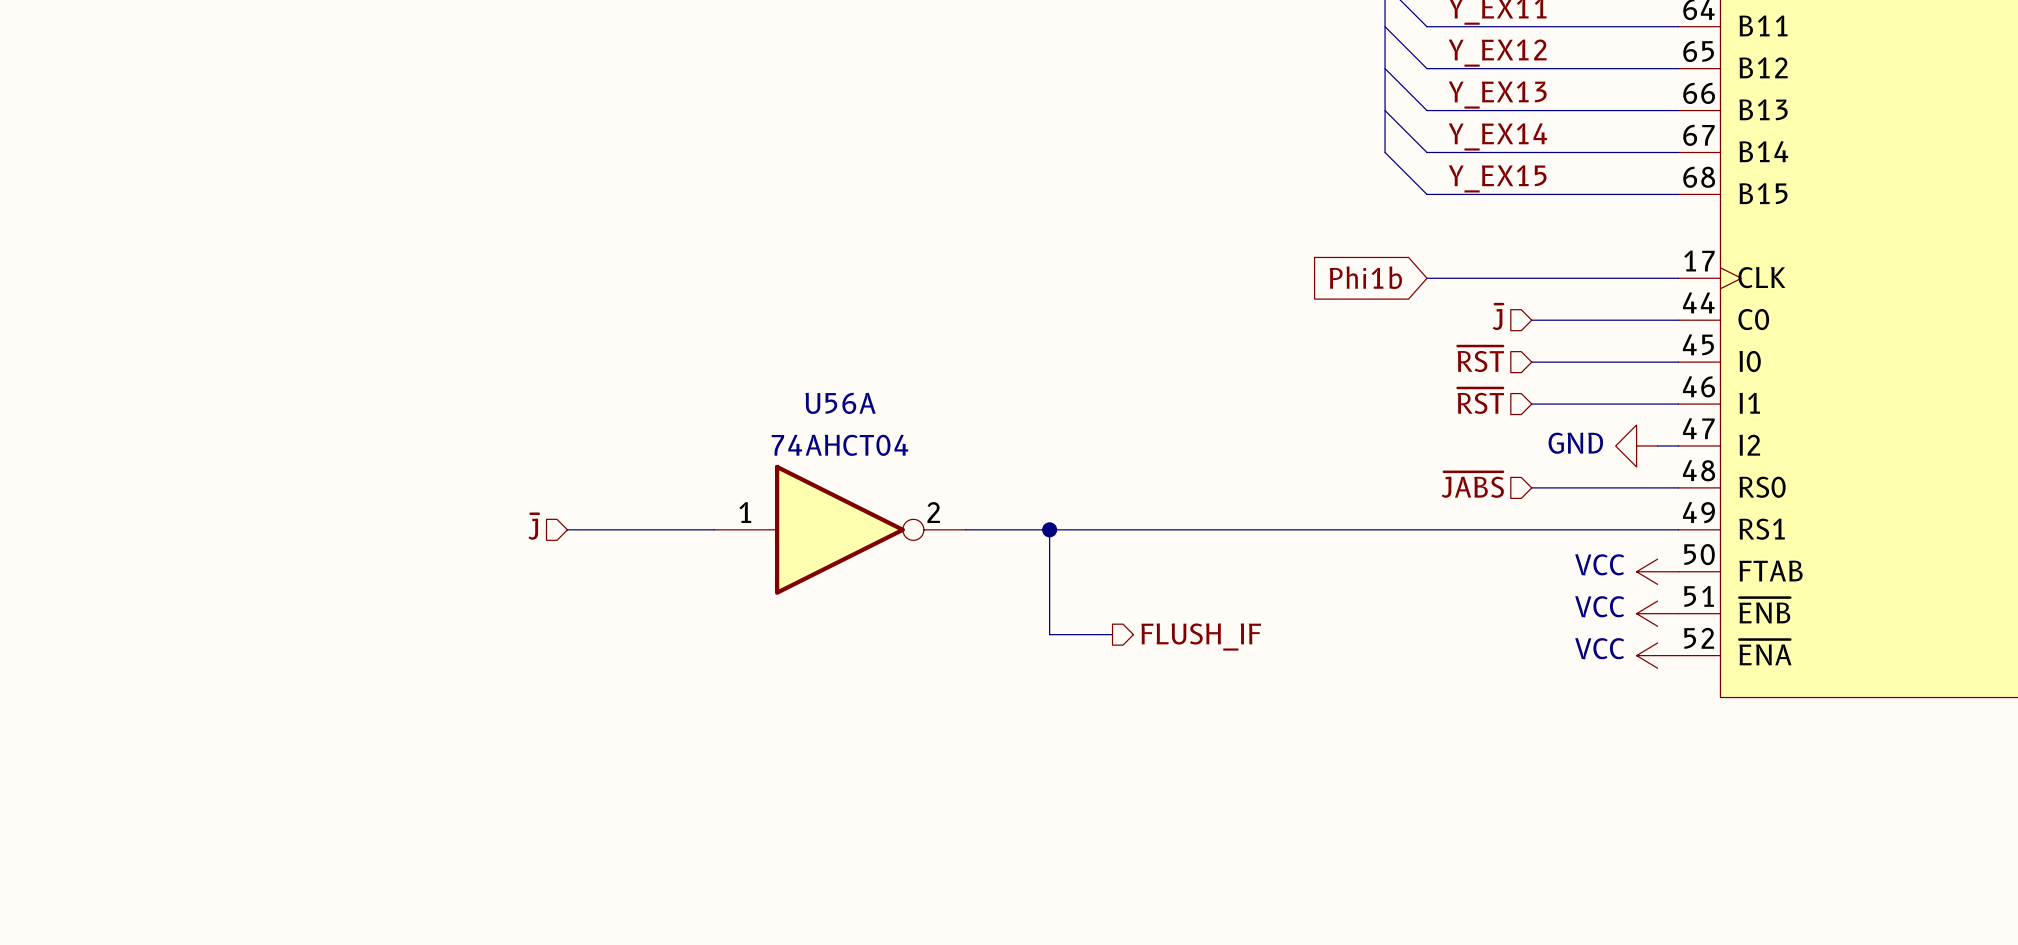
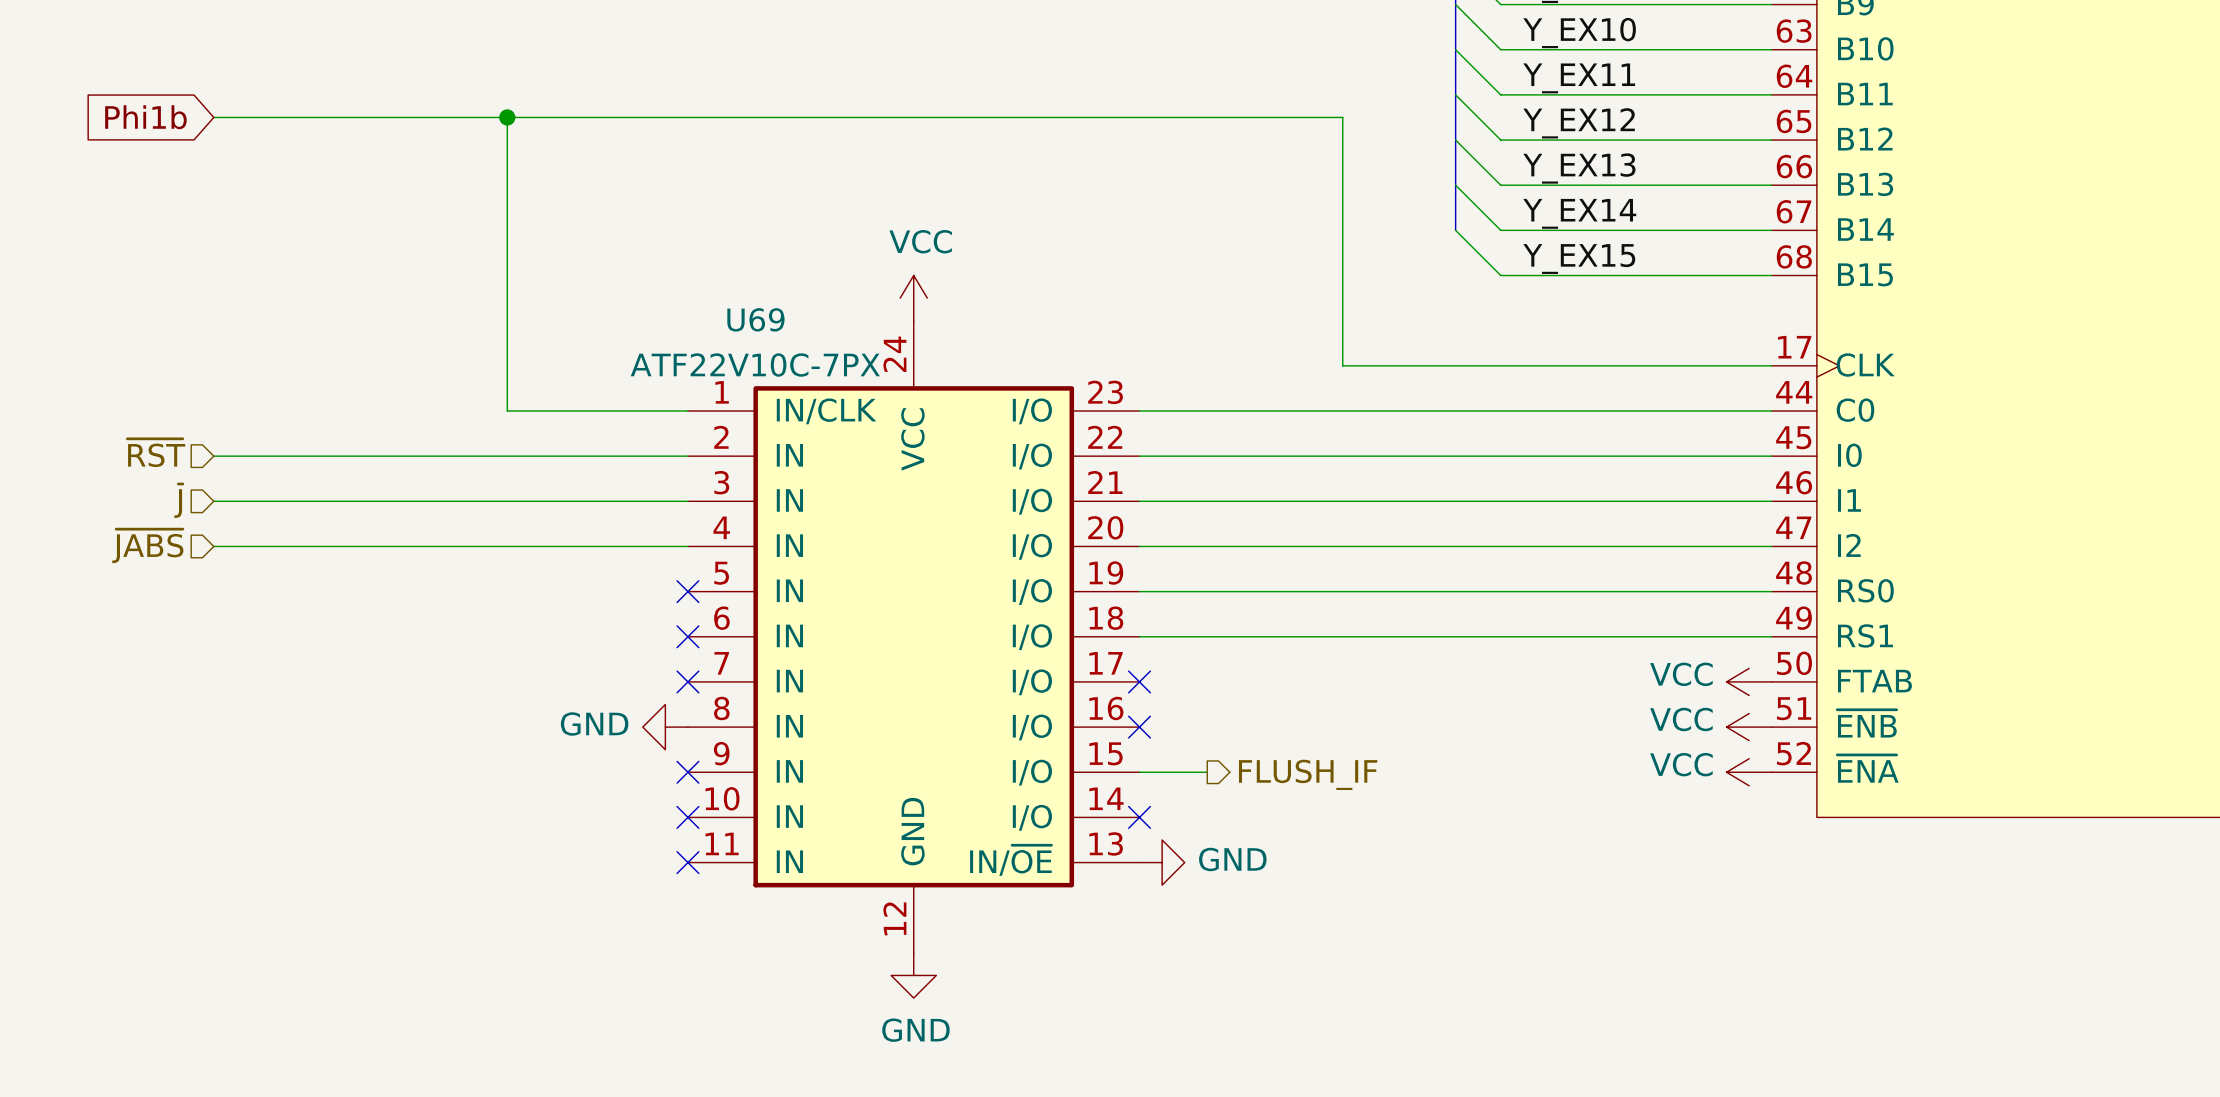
global label: none -> Phi1b (145, 117)
wire: none -> (213, 117) (1342, 117) (1342, 365) (1500, 365)
wire: none -> (507, 117) (507, 410) (687, 410)
junction: none -> (507, 117)
power symbol: none -> VCC (913, 298)
global label: Phi1b (1365, 277) -> none
hierarchical label: ~{J} (1497, 317) -> none
wire: none -> (1139, 410) (1613, 410)
hierarchical label: none -> ~{RST} (156, 452)
hierarchical label: ~{RST} (1480, 359) -> none
wire: none -> (213, 456) (687, 456)
wire: none -> (1139, 456) (1613, 456)
hierarchical label: ~{RST} (1480, 400) -> none
wire: none -> (213, 501) (687, 501)
wire: none -> (1139, 501) (1613, 501)
hierarchical label: none -> ~{JABS} (147, 546)
wire: none -> (213, 546) (687, 546)
wire: none -> (1139, 546) (1749, 546)
power symbol: GND (1636, 445) -> none
hierarchical label: ~{JABS} (1472, 484) -> none
no-connect mark: none -> (687, 591)
wire: none -> (1139, 591) (1613, 591)
hierarchical label position: ~{J} (533, 526) -> ~{J} (178, 500)
wire: (567, 529) (714, 529) -> none
no-connect mark: none -> (687, 636)
U56A: 74AHCT04 (840, 529) -> none
U69: none -> ATF22V10C-7PX (913, 636)
wire: (1049, 529) (1049, 634) (1112, 634) -> none
junction: (1049, 529) -> none
no-connect mark: none -> (687, 681)
no-connect mark: none -> (1139, 681)
power symbol: none -> GND (665, 727)
no-connect mark: none -> (1139, 727)
hierarchical label position: FLUSH_IF (1201, 637) -> FLUSH_IF (1308, 774)
no-connect mark: none -> (687, 772)
wire: none -> (1139, 772) (1207, 772)
no-connect mark: none -> (687, 817)
no-connect mark: none -> (1139, 817)
no-connect mark: none -> (687, 862)
power symbol: none -> GND (1162, 862)
power symbol: none -> GND (913, 975)

